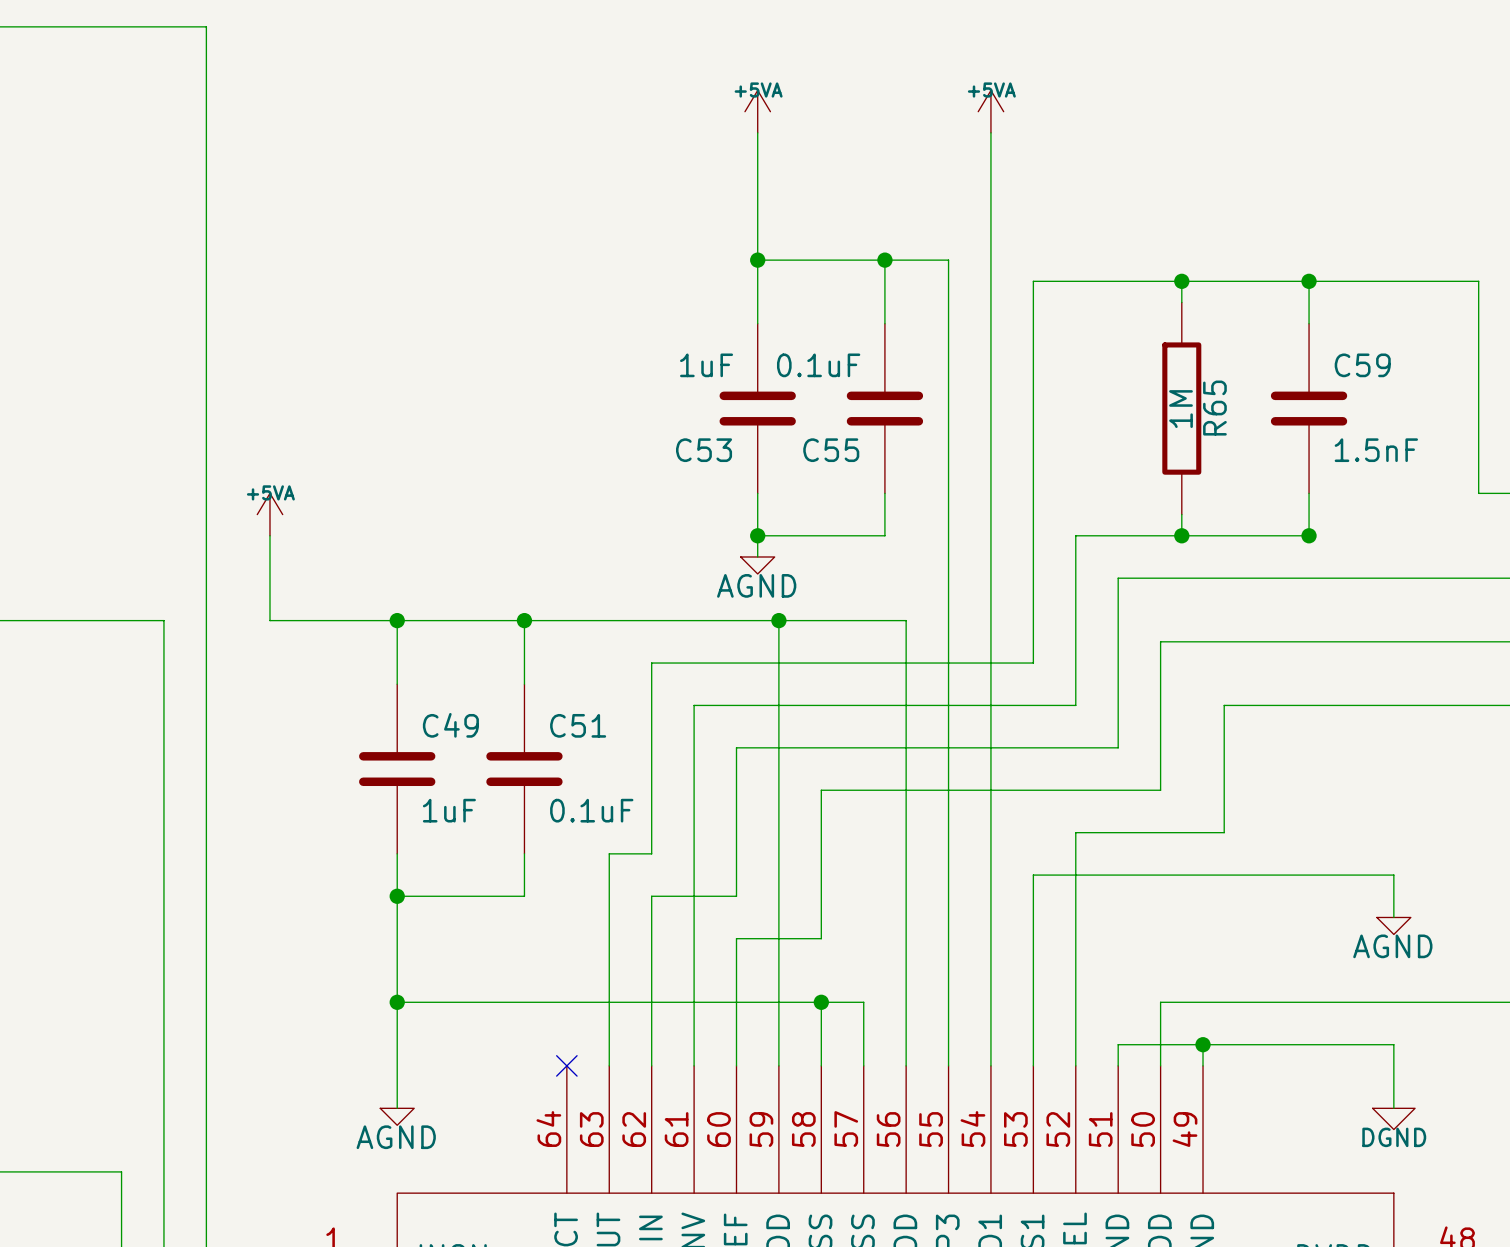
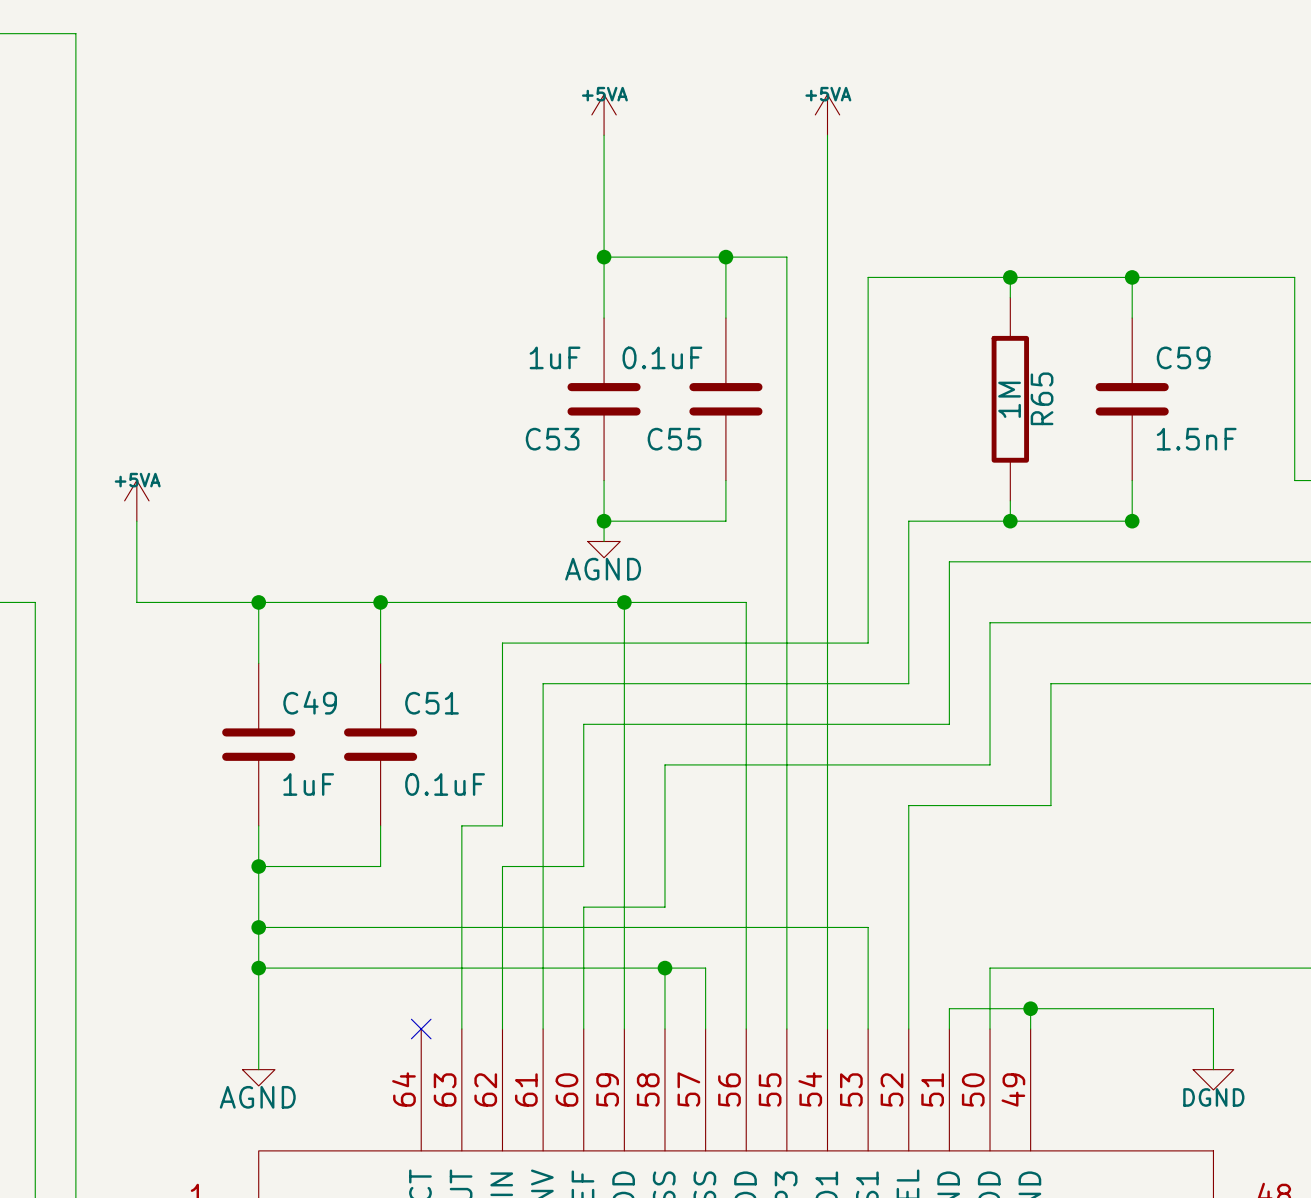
wire: (1393, 917) (1393, 875) (1033, 875) (1033, 959) -> (258, 927) (868, 927)
power symbol: AGND (1393, 925) -> none
junction: none -> (258, 927)

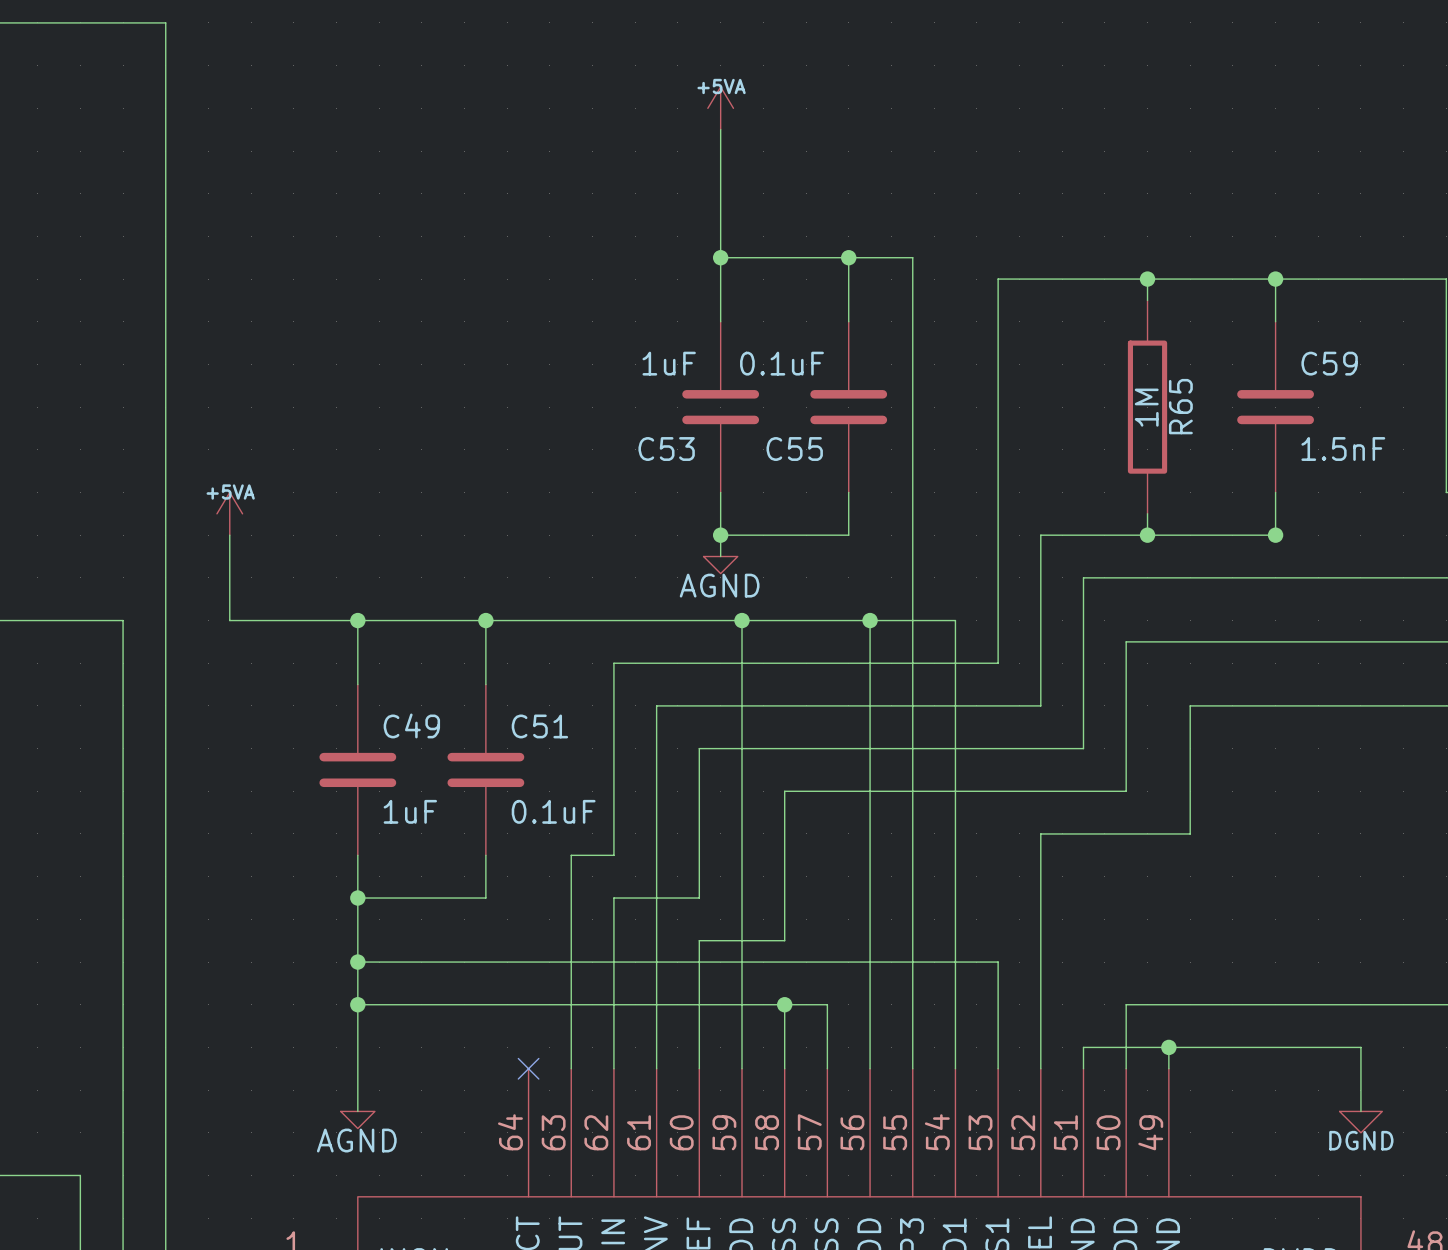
power symbol: +5VA (827, 114) -> none
wire: (827, 135) (827, 602) -> (870, 620) (955, 620)
junction: none -> (870, 620)

